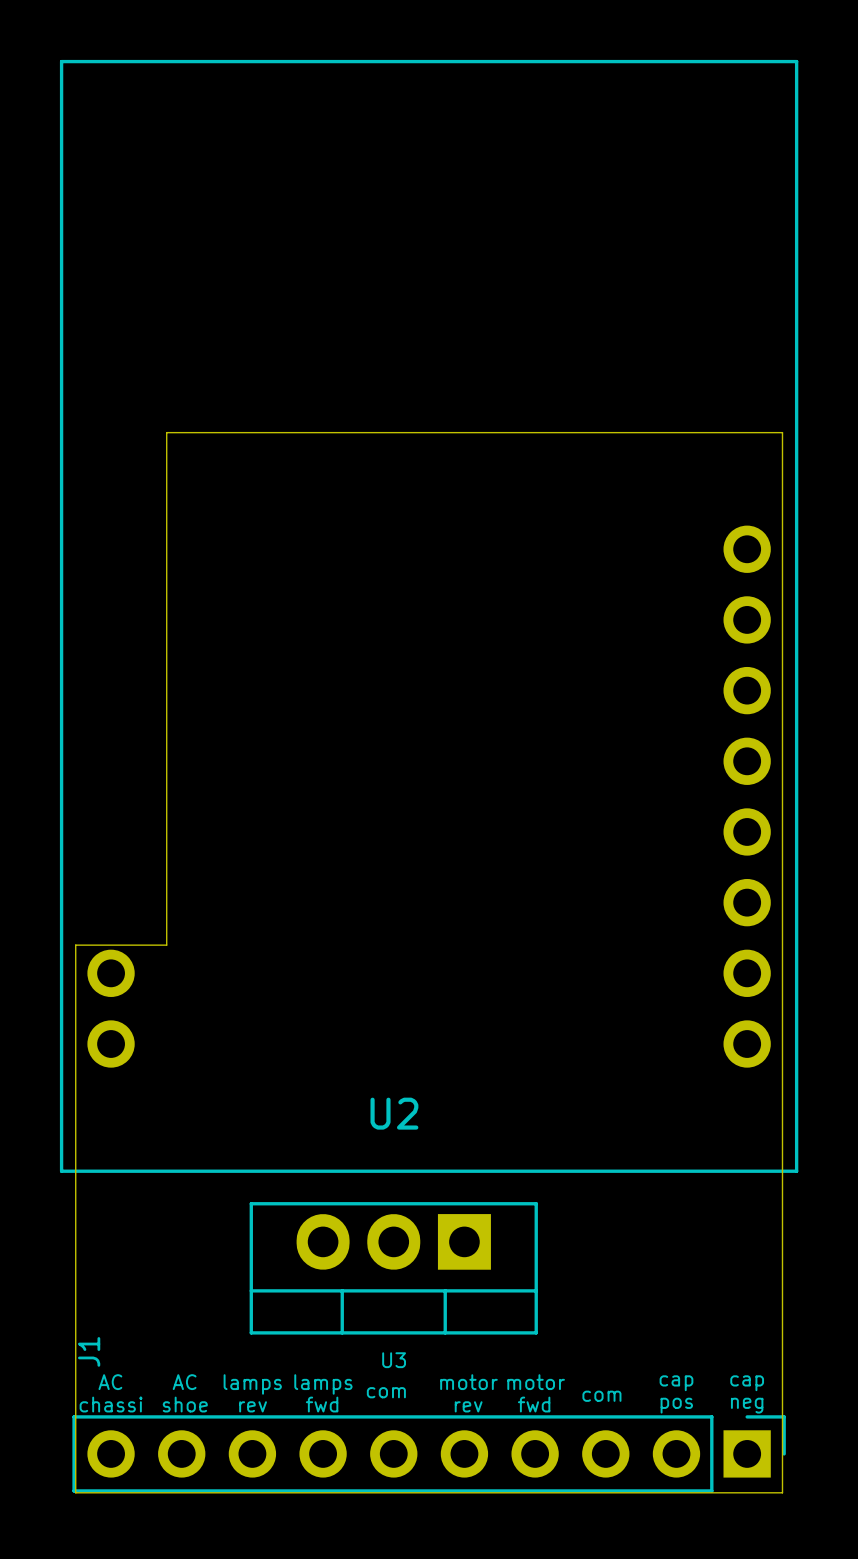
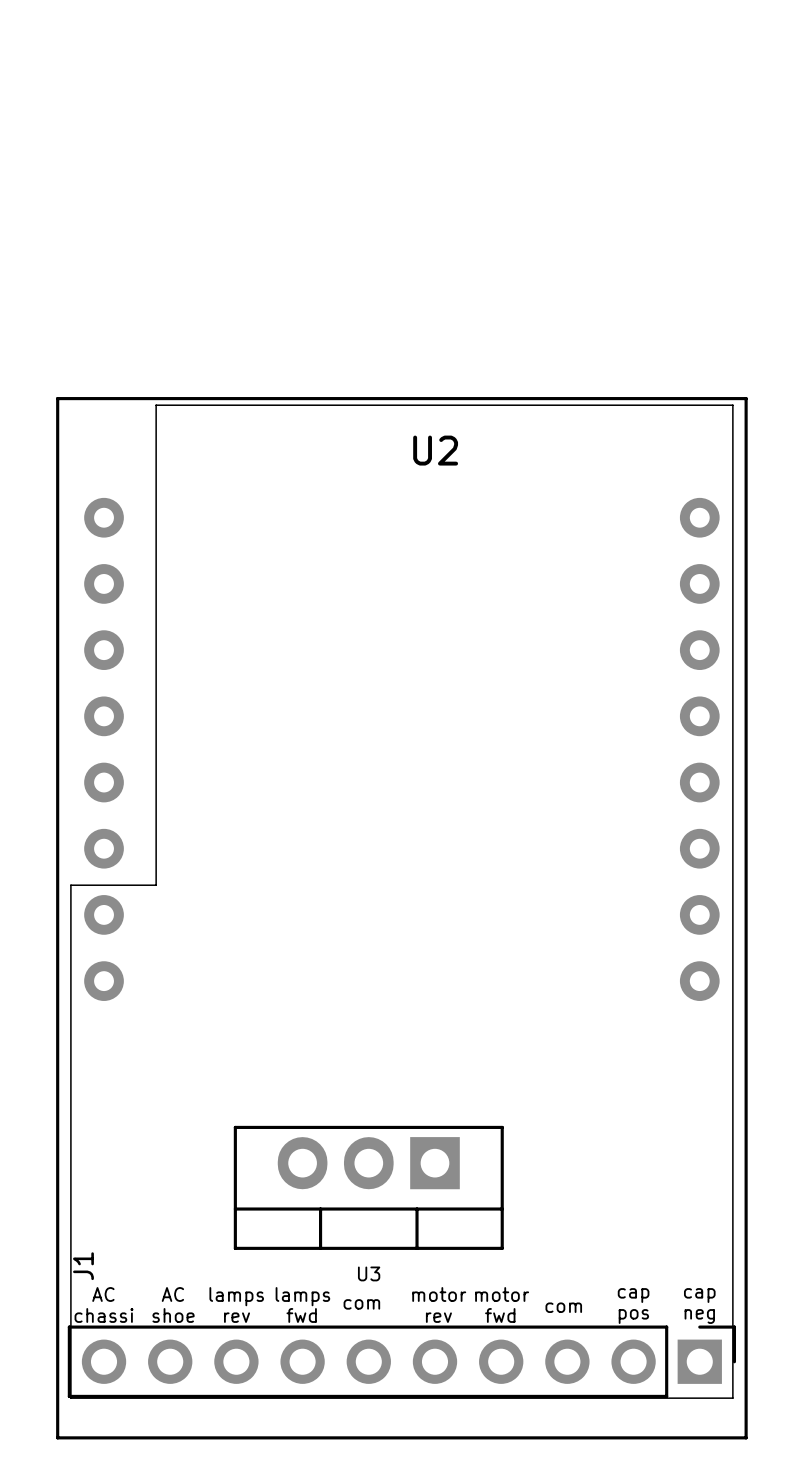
U2 footprint: [59, 59, 799, 1173] -> [56, 397, 748, 1440]
U2 name position: U2 (394, 1113) -> U2 (435, 450)

